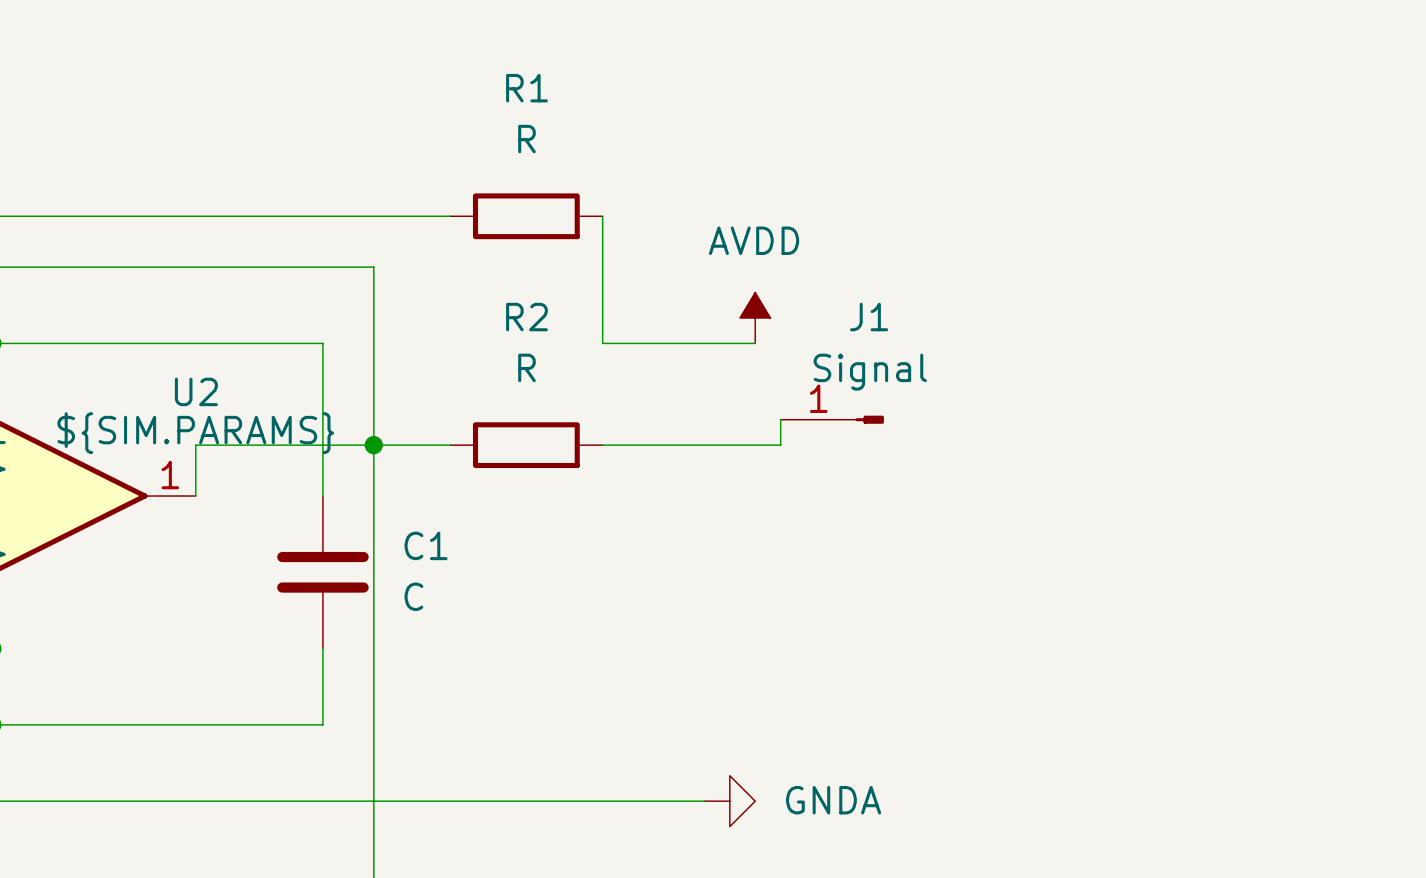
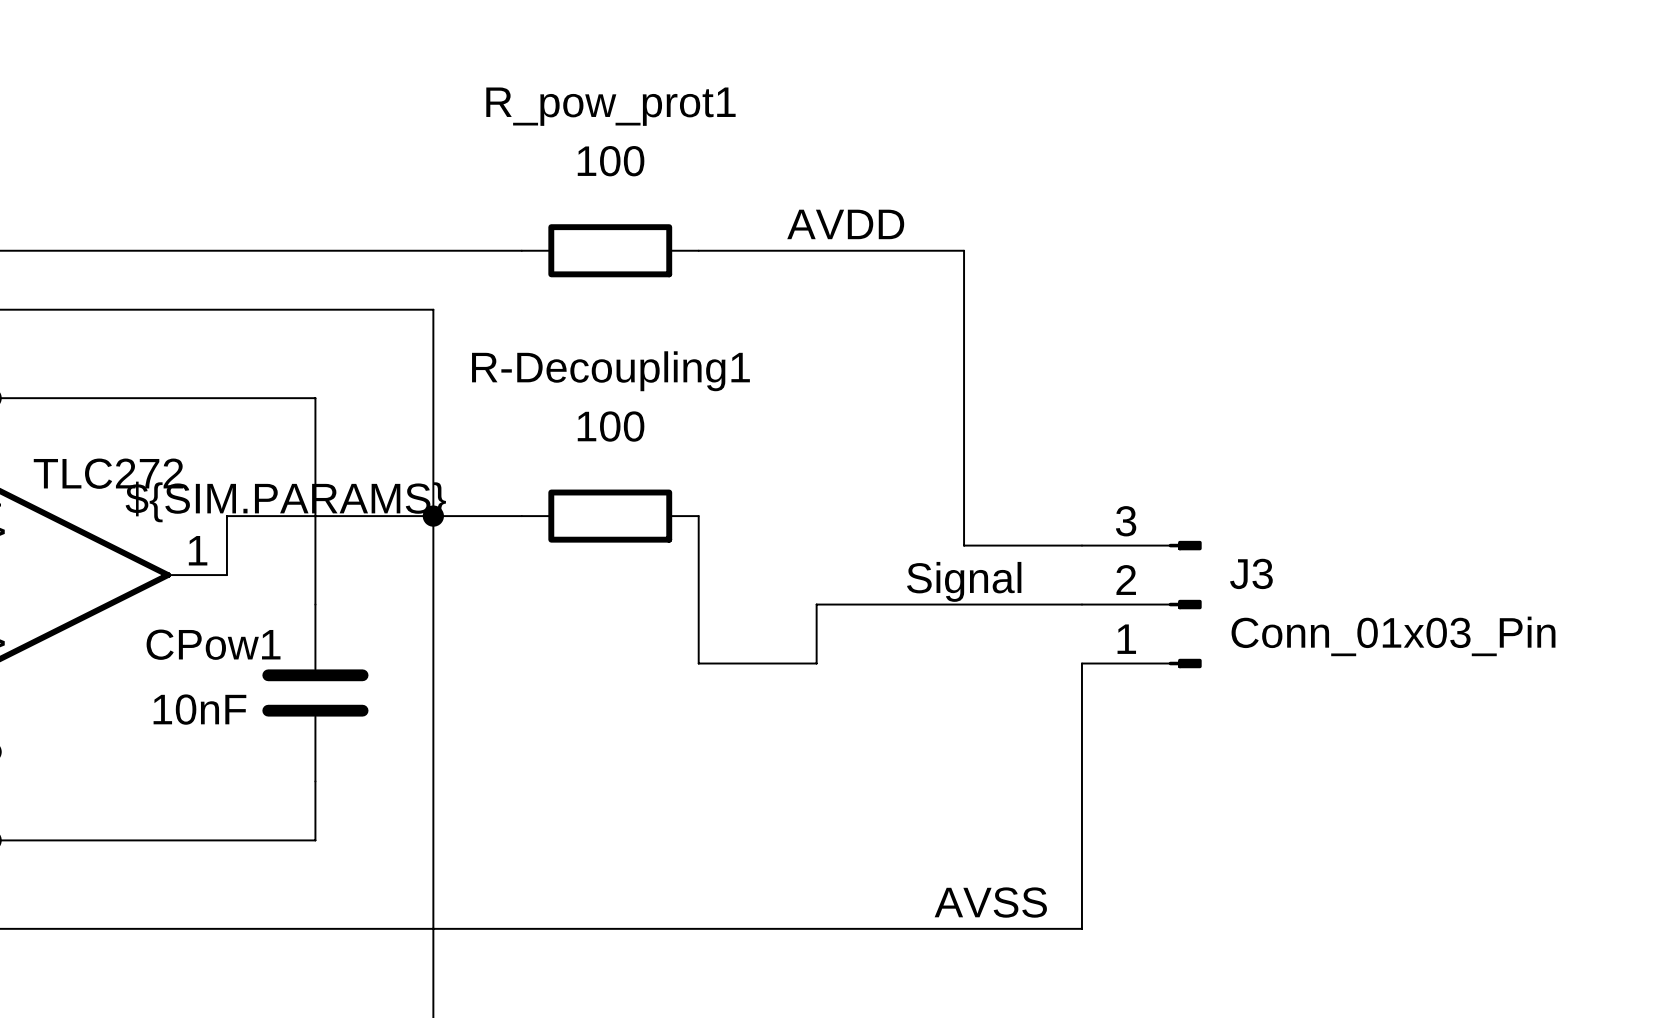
R1 name: R1 (526, 88) -> R_pow_prot1 (610, 106)
R1 value: R (526, 139) -> 100 (611, 161)
label: none -> AVDD (845, 224)
wire: (602, 216) (602, 343) (755, 343) -> (698, 250) (964, 250) (964, 545) (1081, 545)
R2 name: R2 (526, 317) -> R-Decoupling1 (610, 371)
power symbol: AVDD (755, 318) -> none
wire: (272, 343) (322, 343) (322, 496) -> (315, 398) (315, 604)
R2 value: R (526, 367) -> 100 (611, 426)
U2 name: U2 (196, 391) -> TLC272 (108, 473)
wire: (780, 419) (780, 445) (602, 445) -> (1081, 604) (816, 604) (816, 663) (698, 663) (698, 516)
J1: Signal (832, 419) -> none
U2 value position: ${SIM.PARAMS} (195, 433) -> ${SIM.PARAMS} (285, 501)
label: none -> Signal (964, 581)
J3: none -> Conn_01x03_Pin (1141, 604)
C1: C (322, 572) -> none
wire: none -> (1081, 663) (1081, 928) (816, 928)
CPow1: none -> 10nF (315, 692)
wire: (322, 648) (322, 724) (272, 724) -> (315, 781) (315, 840)
label: none -> AVSS (990, 902)
power symbol: GNDA (729, 801) -> none

